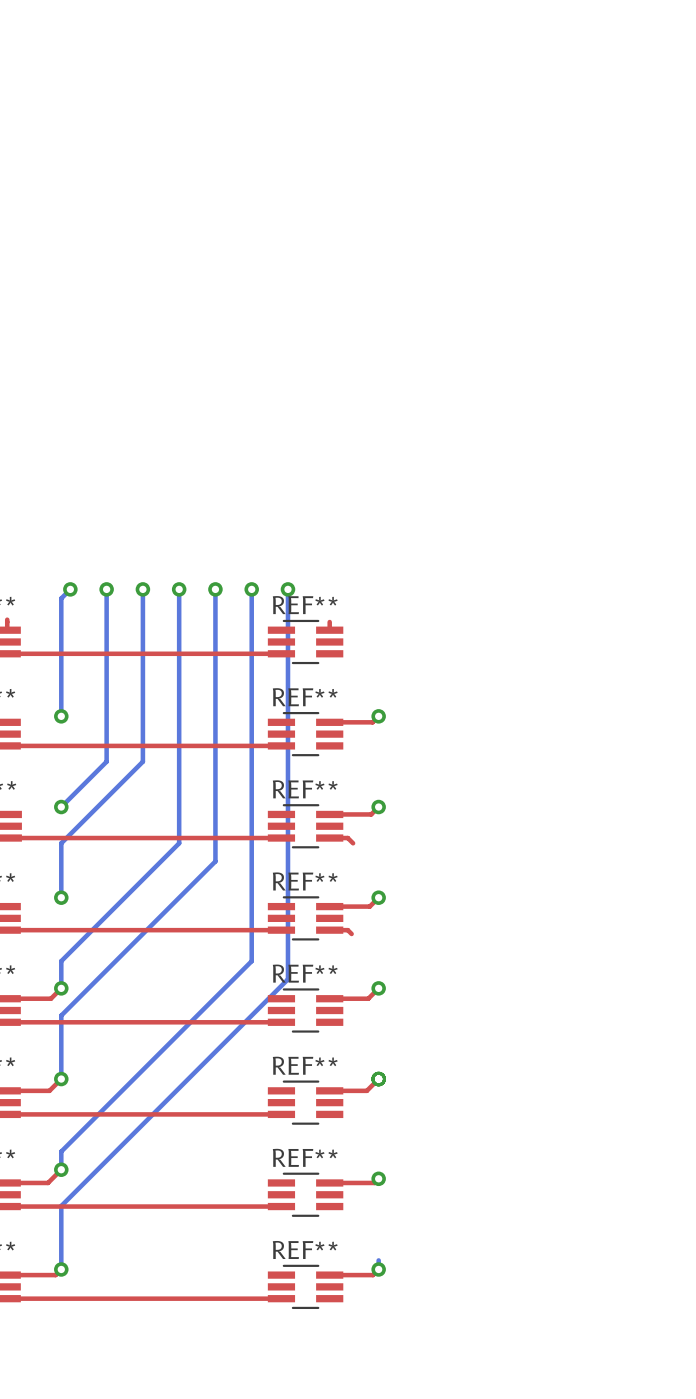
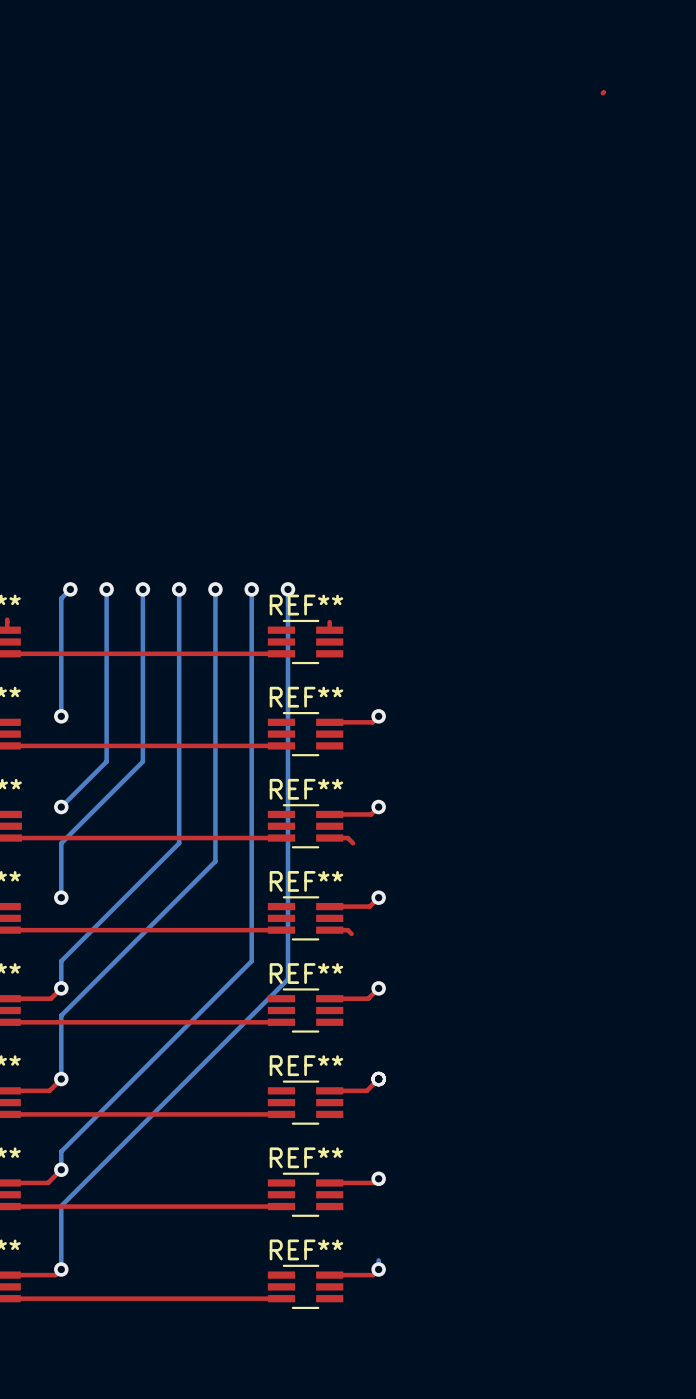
top track: none -> (603, 92) (602, 93)

